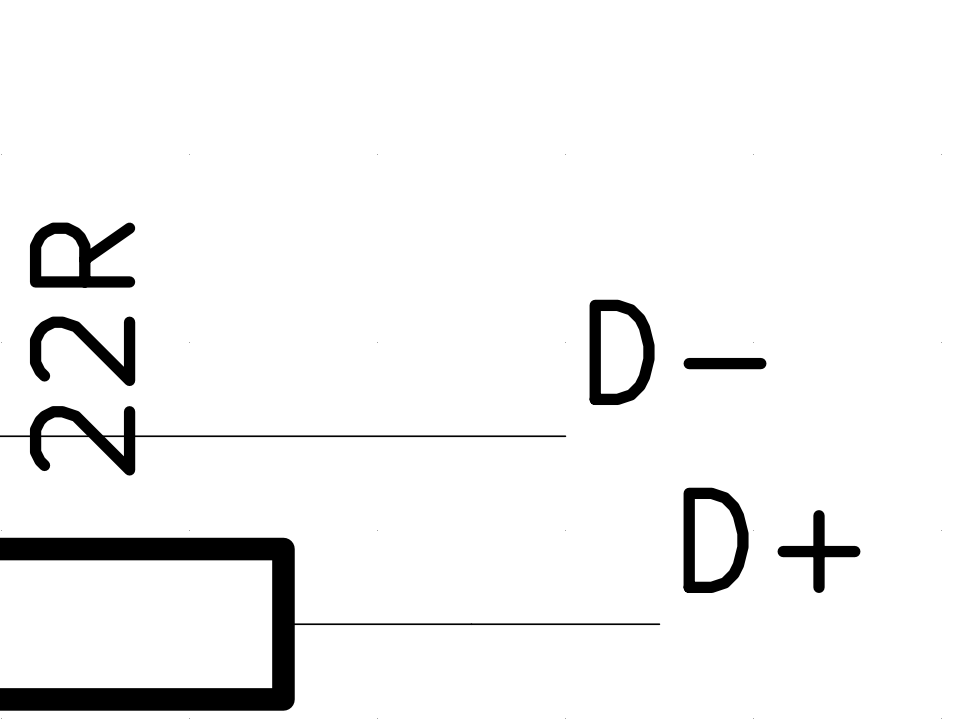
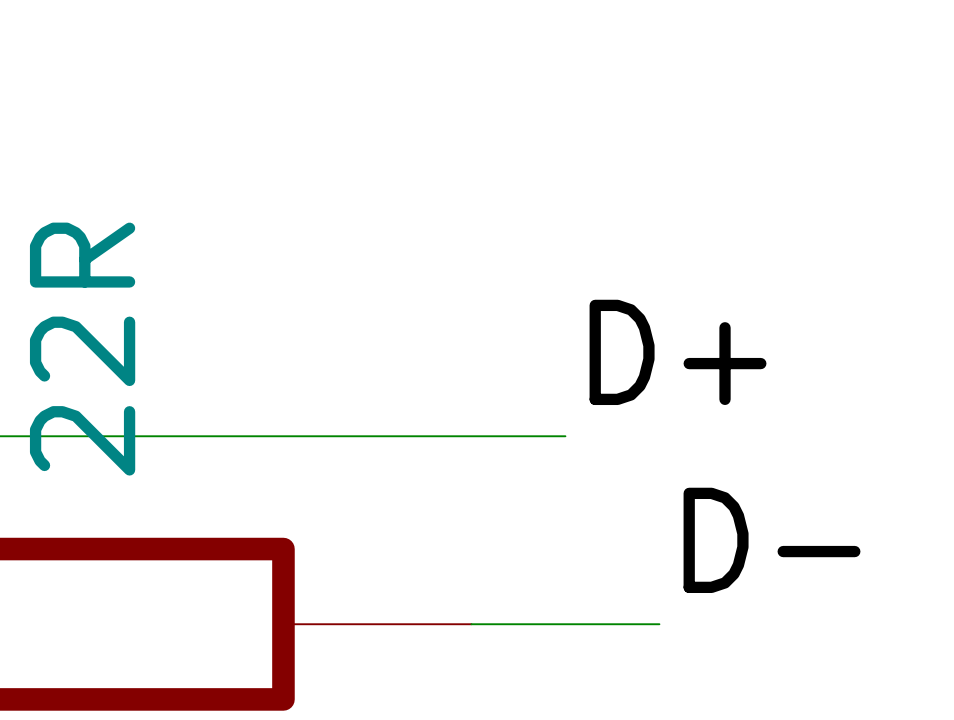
label: D- (678, 352) -> D+ (678, 352)
label: D+ (772, 540) -> D- (772, 540)

